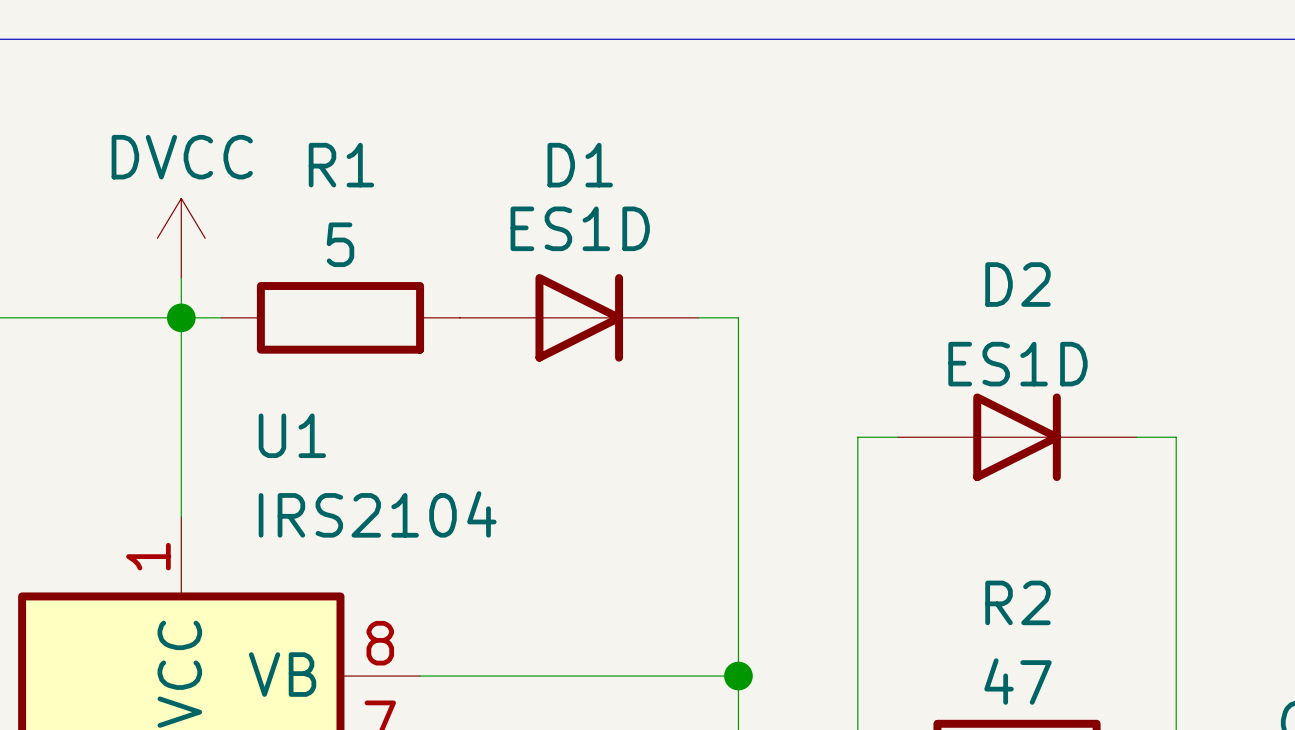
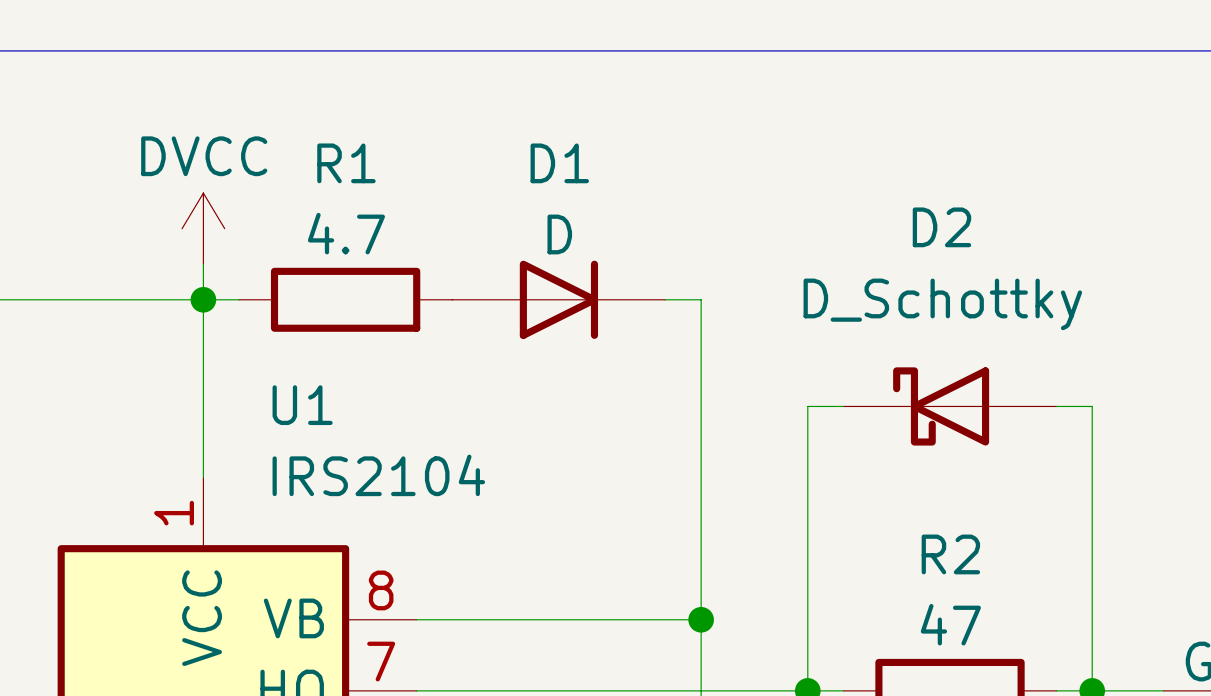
D1 value: ES1D (580, 228) -> D (559, 234)
R1 value: 5 (340, 244) -> 4.7 (346, 233)
D2 name position: D2 (1017, 284) -> D2 (941, 227)
D2 value: ES1D (1017, 364) -> D_Schottky (942, 304)
D2 symbol: [897, 393, 1137, 482] -> [843, 367, 1057, 446]

